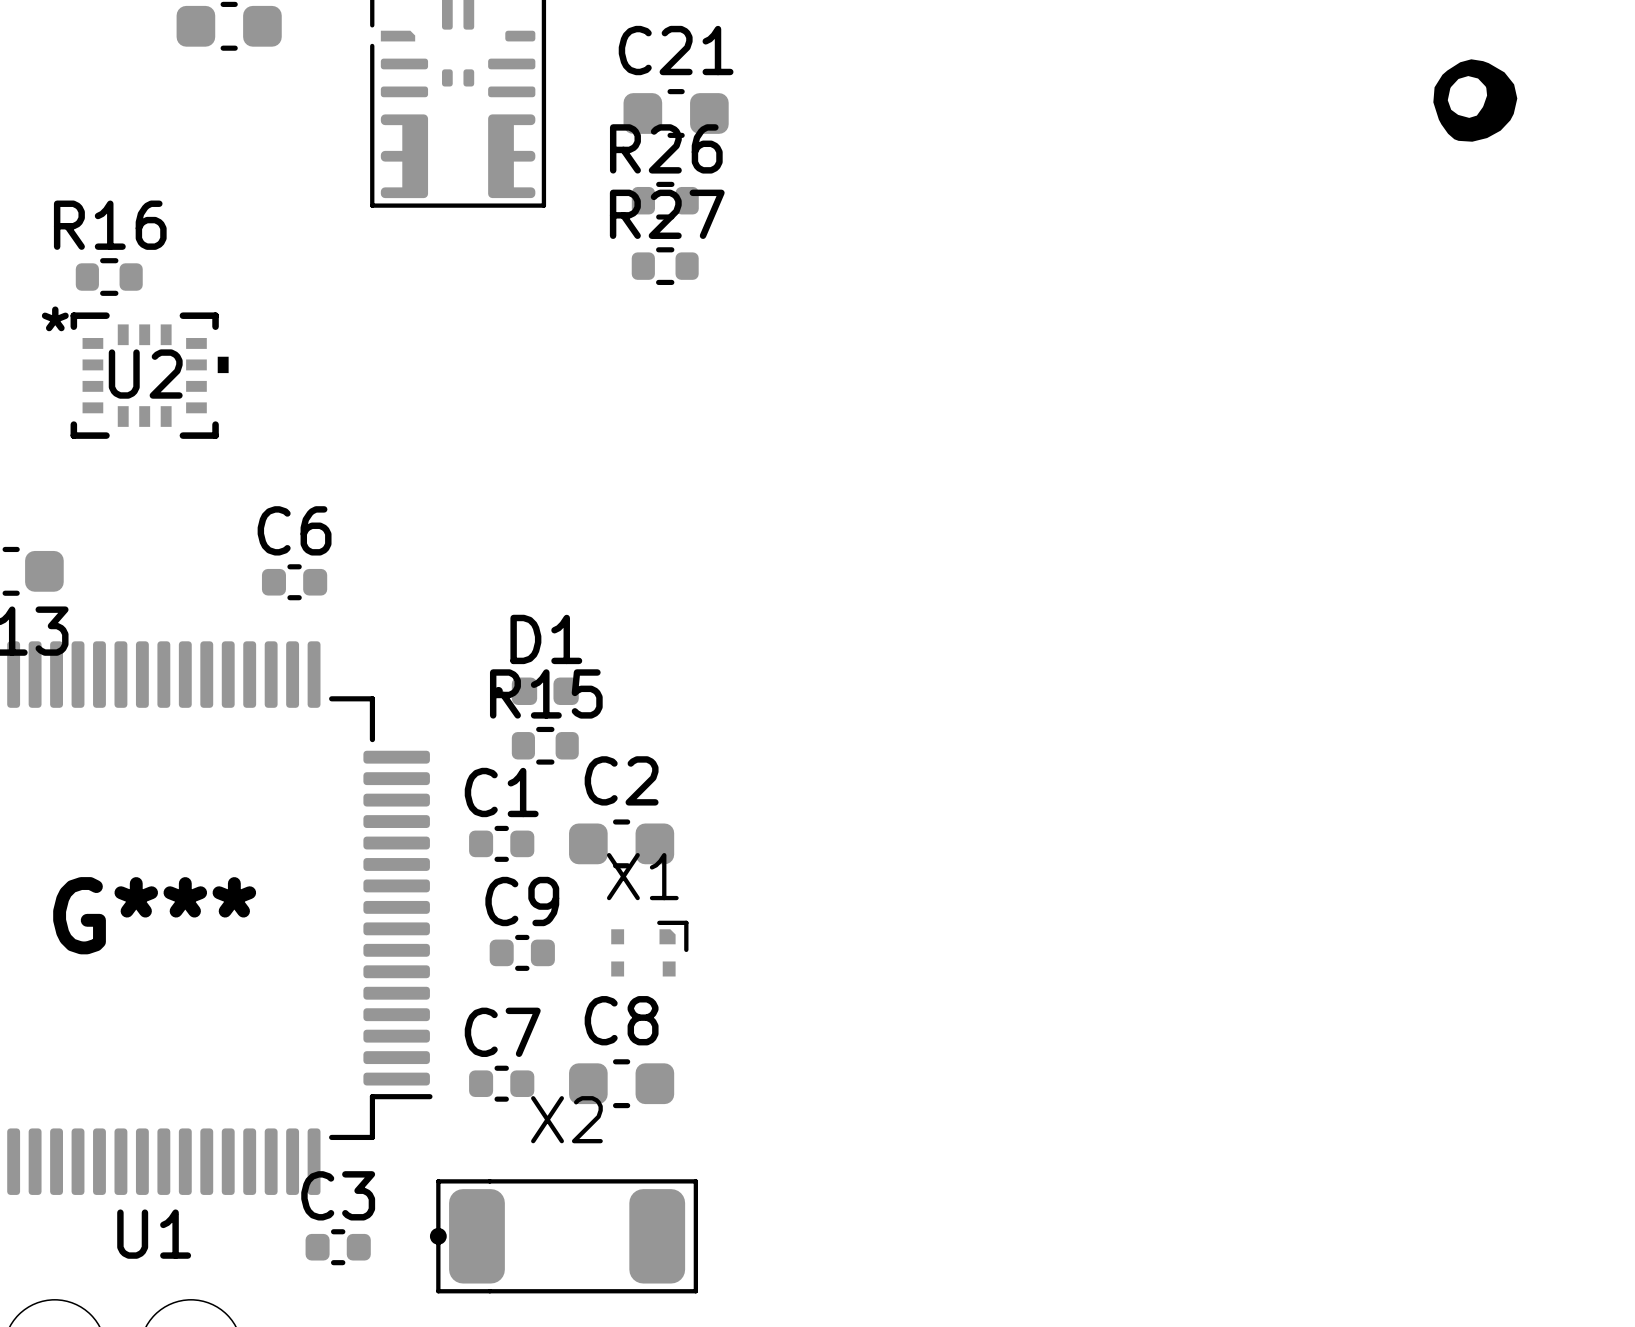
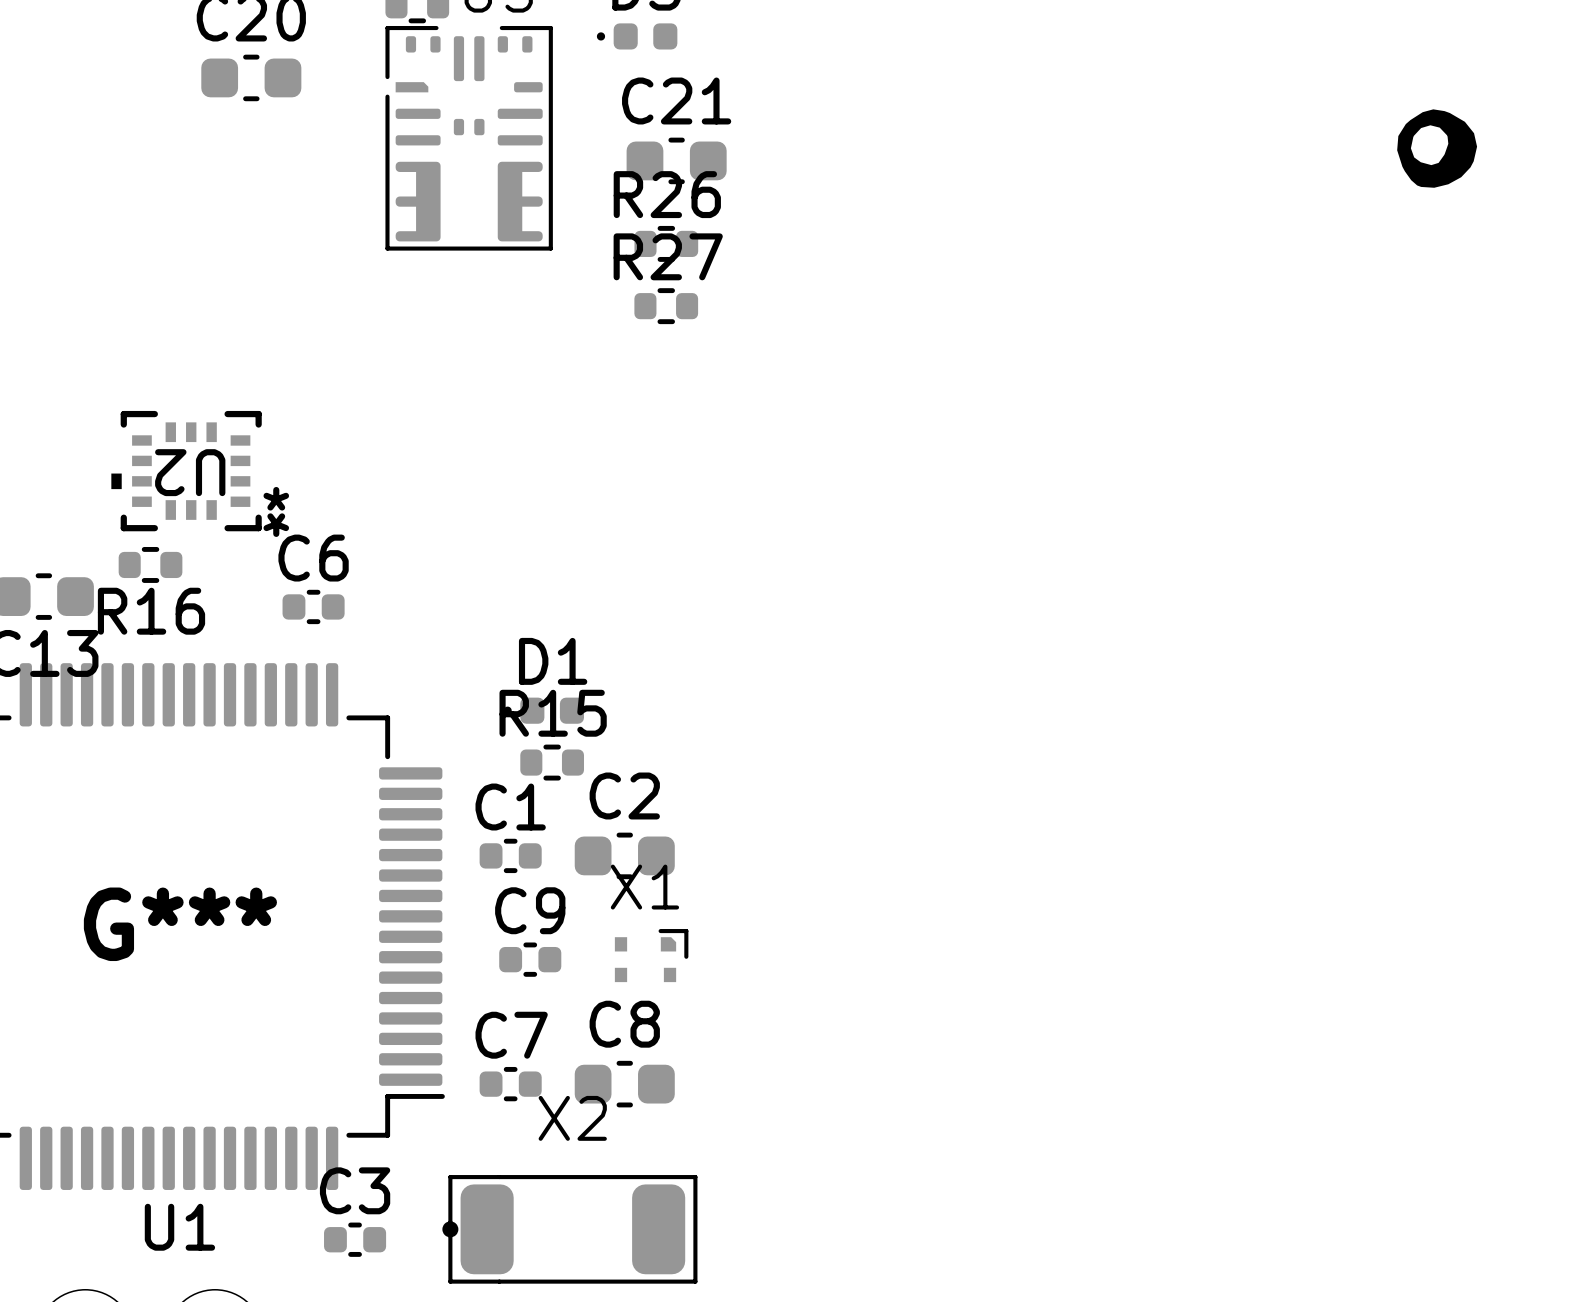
R16 name position: R16 (110, 225) -> R16 (151, 611)
R16 position: (109, 277) -> (150, 564)
U2 rotation: 0° (149, 375) -> 180° (186, 471)

